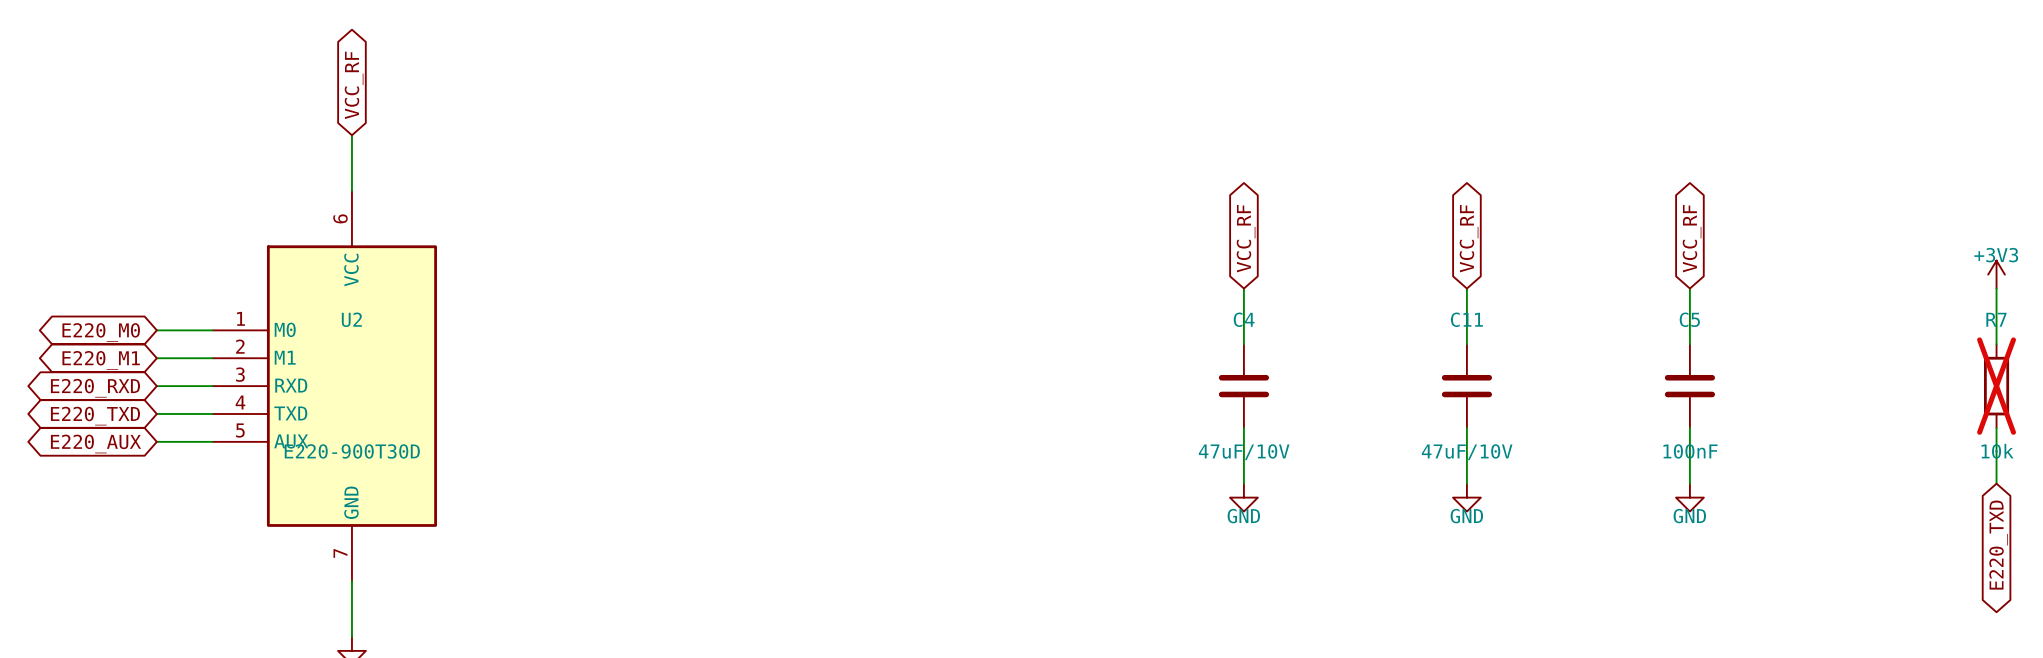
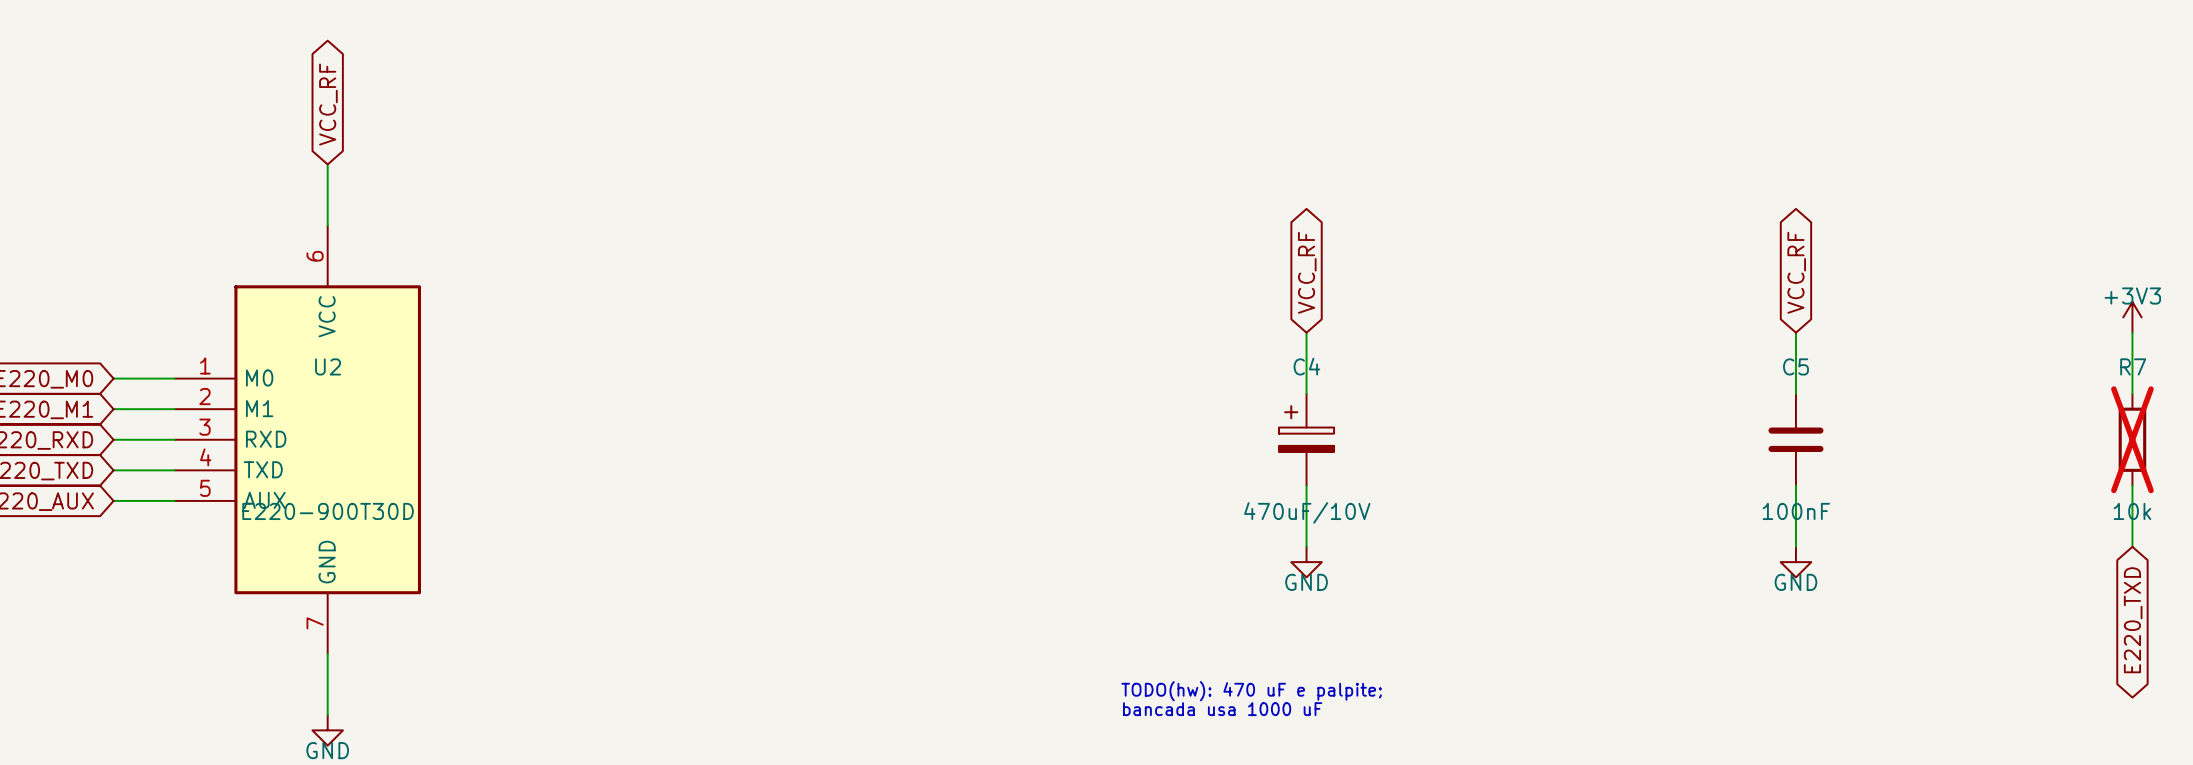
global label: VCC_RF (1469, 238) -> none
wire: (1466, 288) (1466, 344) -> none
C4 symbol: [1218, 344, 1270, 428] -> [1279, 393, 1335, 486]
C11: 47uF/10V (1466, 386) -> none
wire: (1466, 427) (1466, 483) -> none
C4 value: 47uF/10V (1244, 452) -> 470uF/10V (1307, 512)
power symbol: GND (1466, 497) -> none
text: none -> TODO(hw): 470 uF e palpite; (1251, 691)
text: none -> bancada usa 1000 uF (1222, 709)

